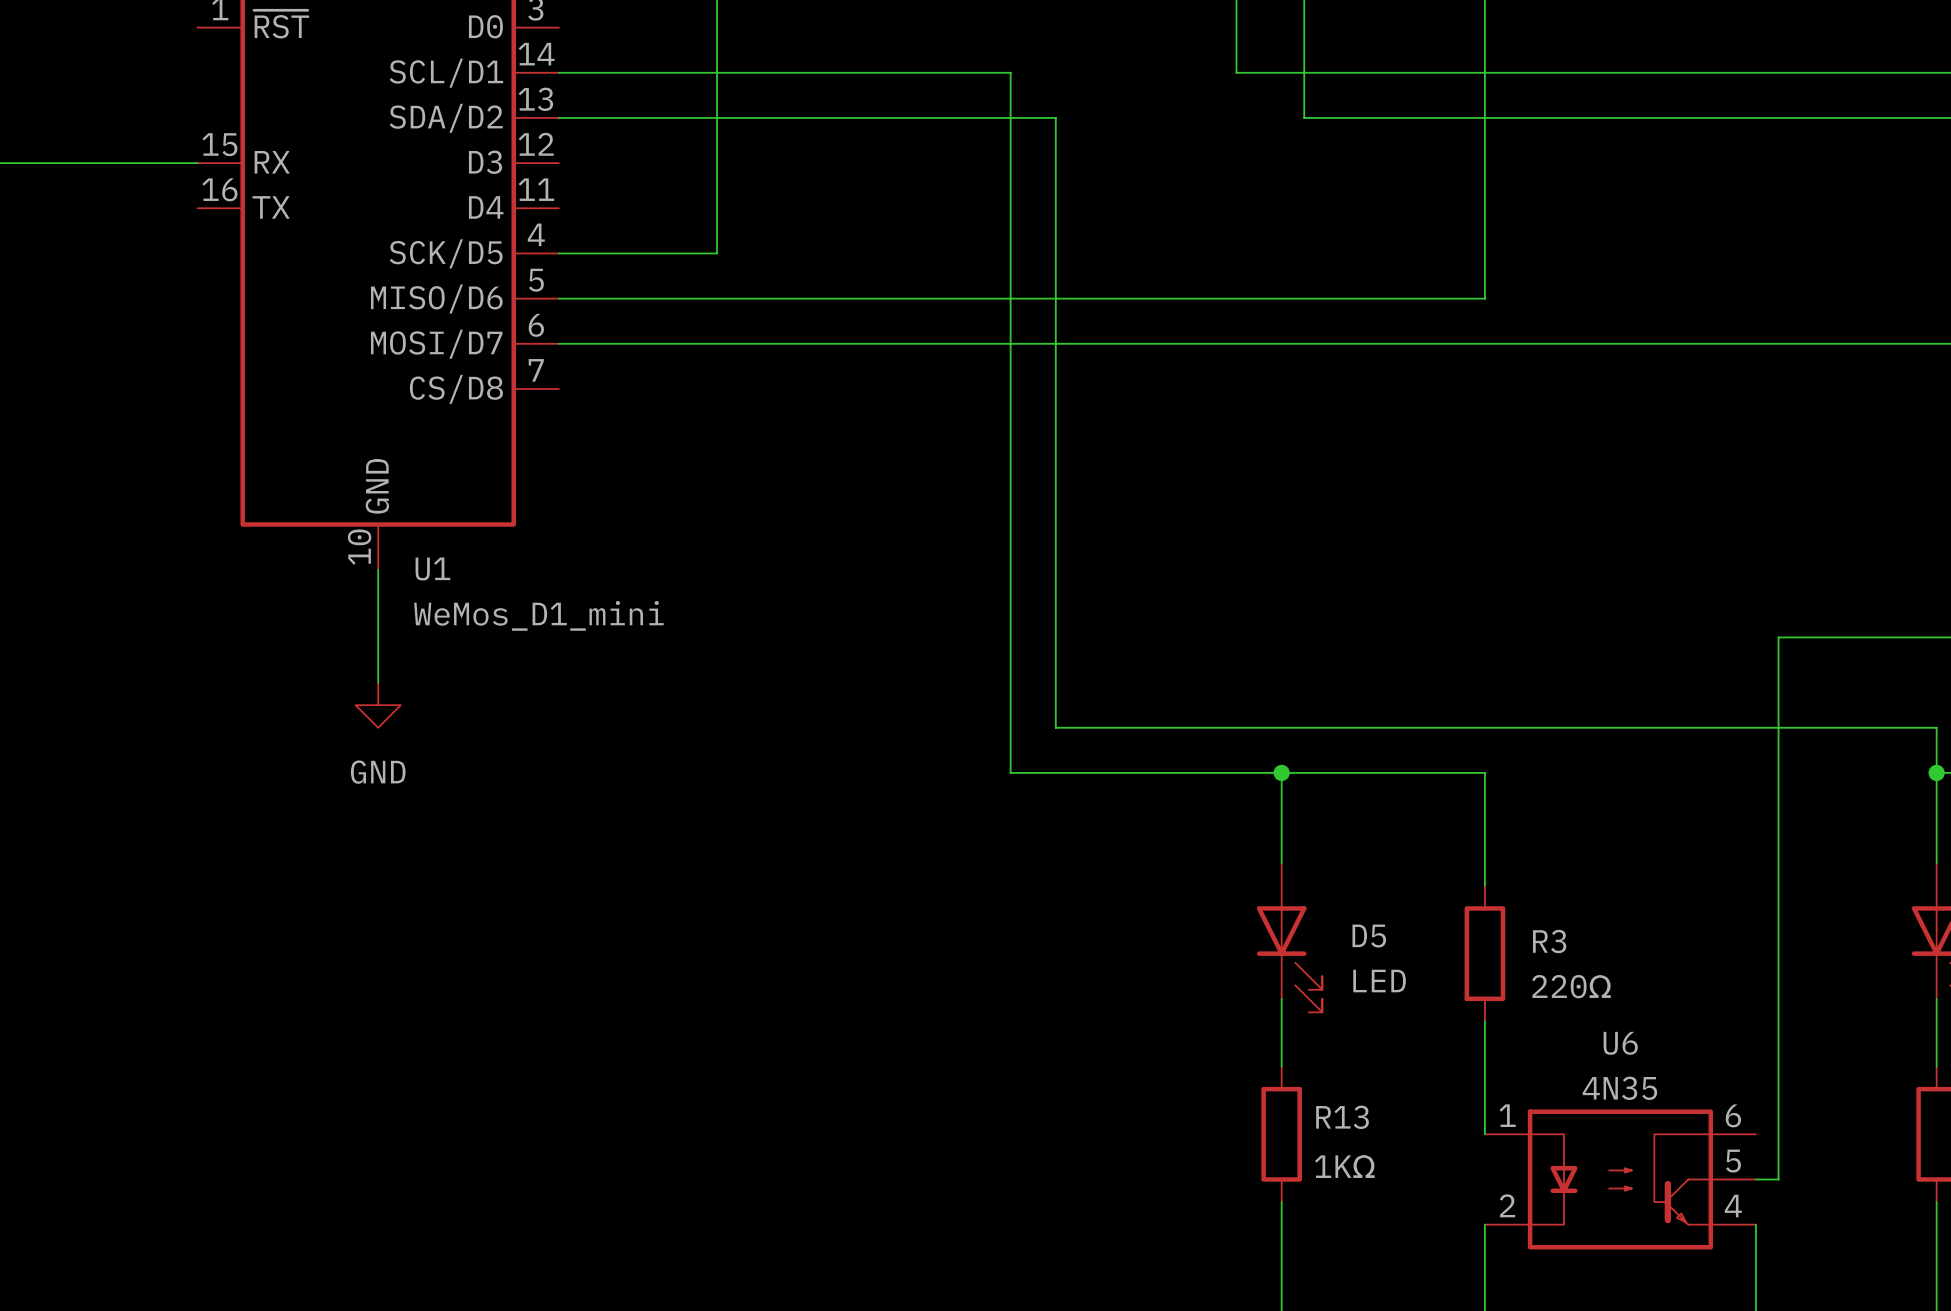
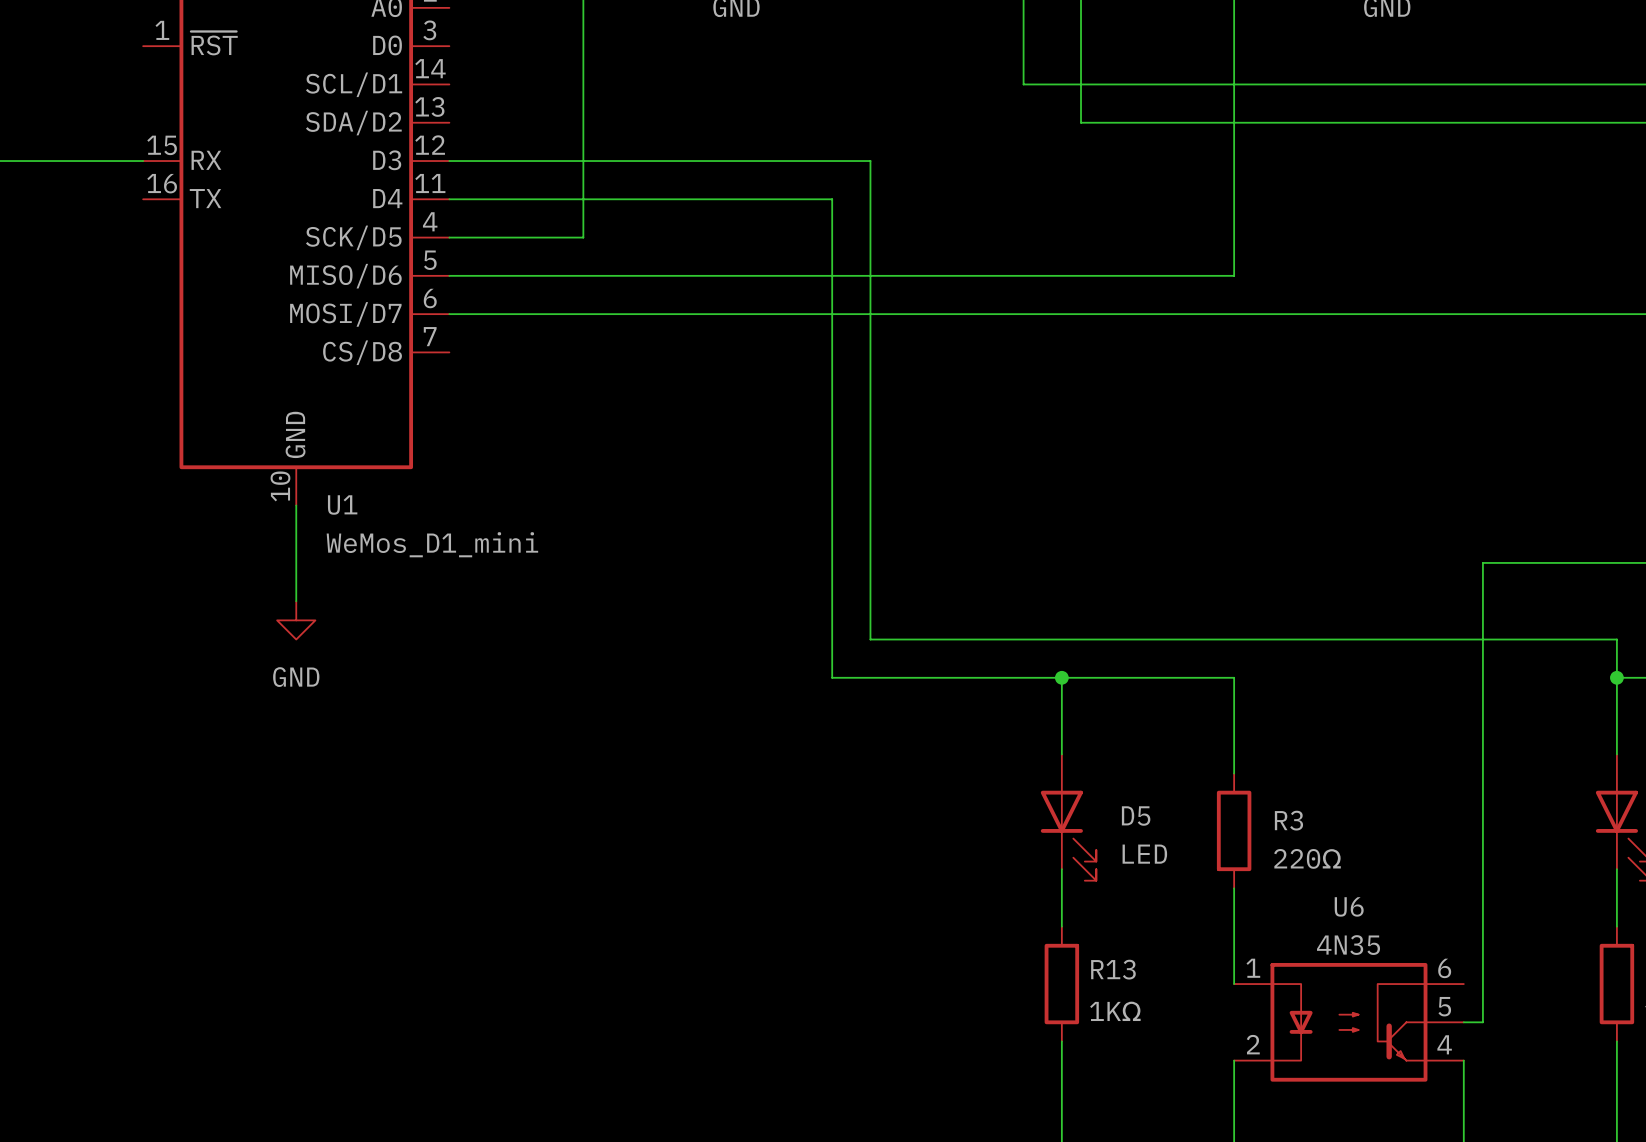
wire: (558, 72) (1010, 72) (1010, 208) -> (449, 199) (832, 199)
wire: (558, 117) (1055, 117) (1055, 163) -> (449, 161) (870, 161)

